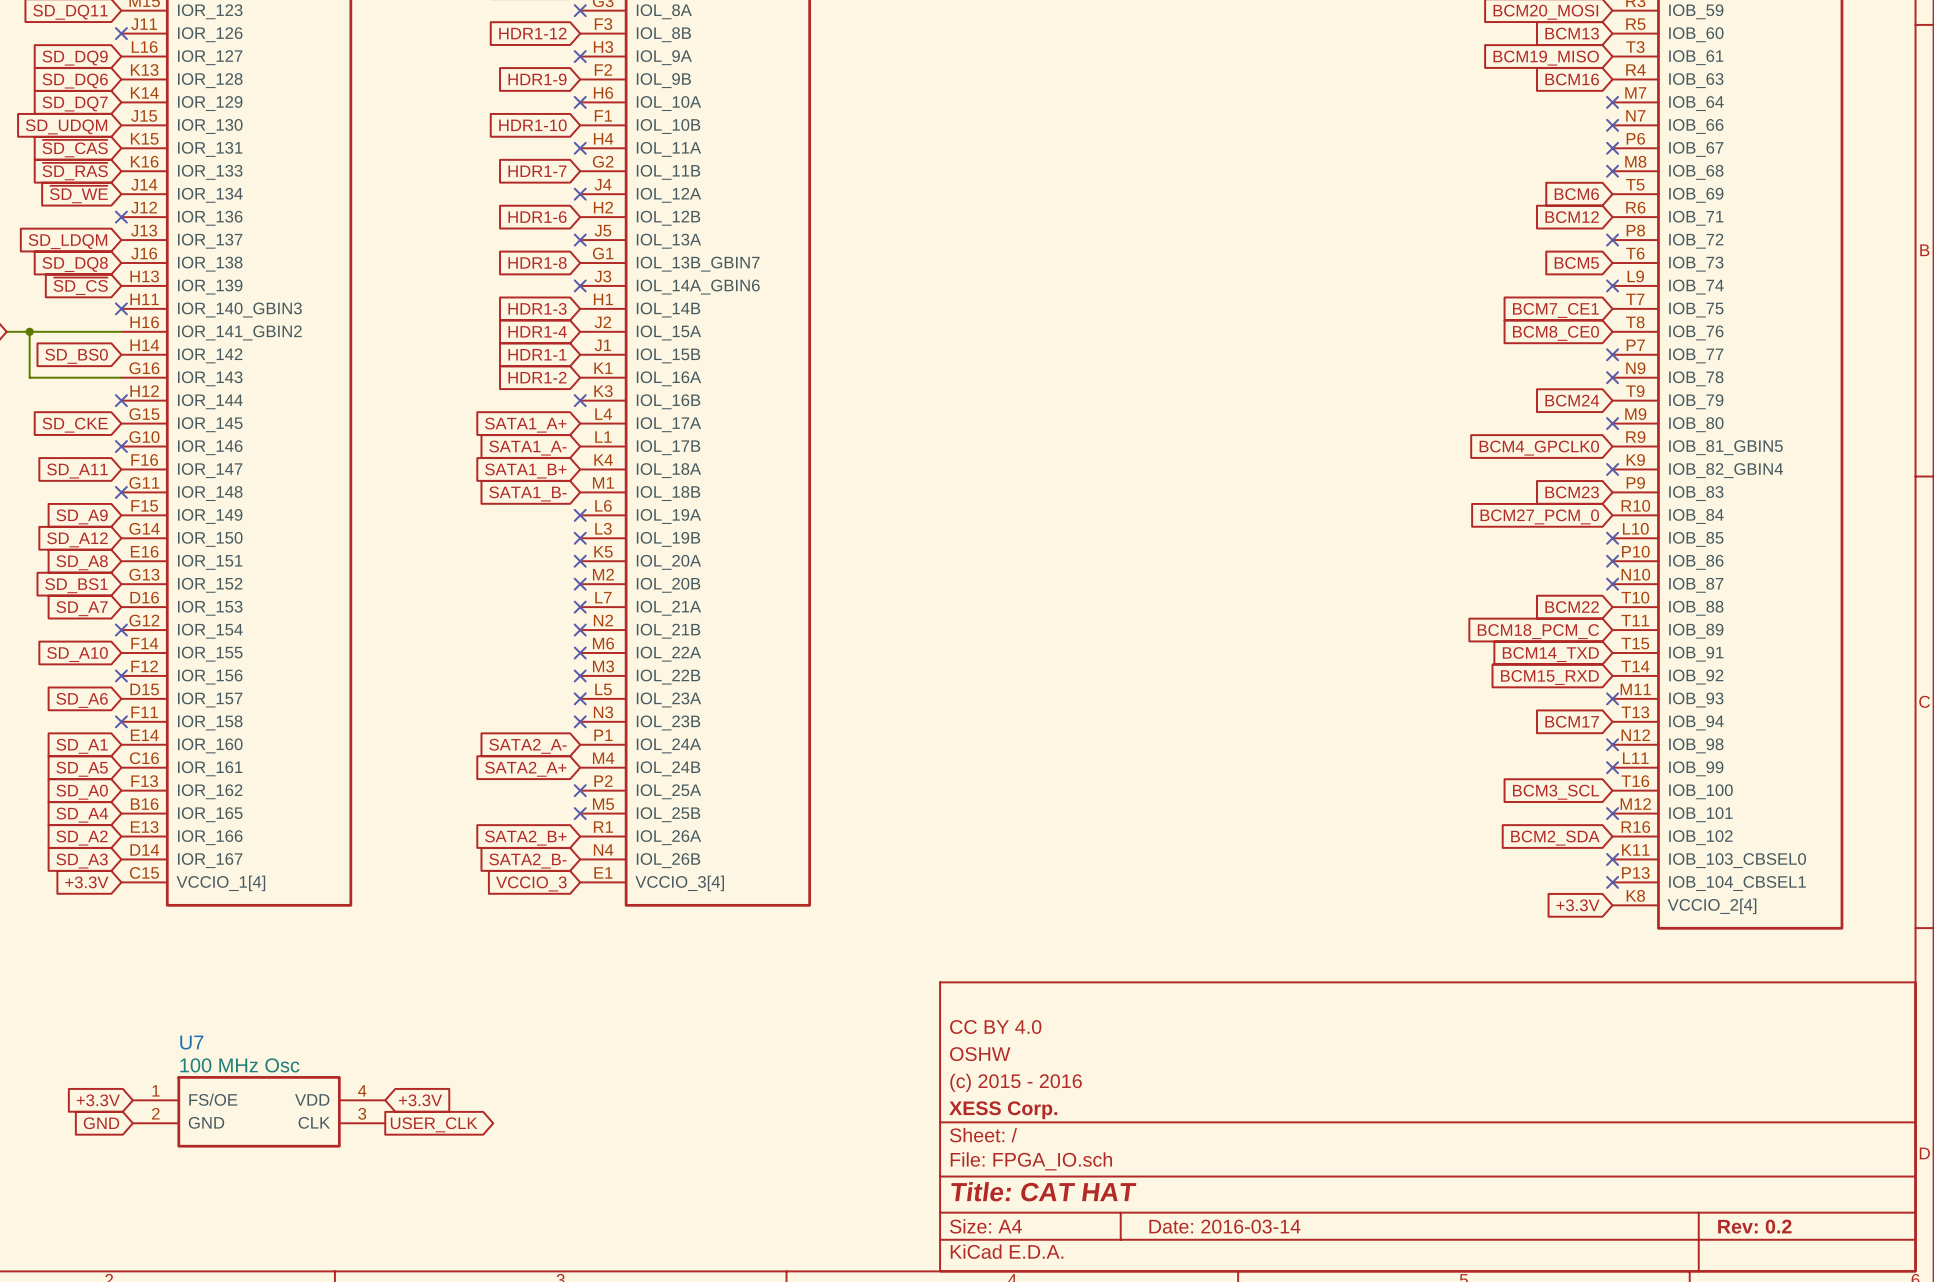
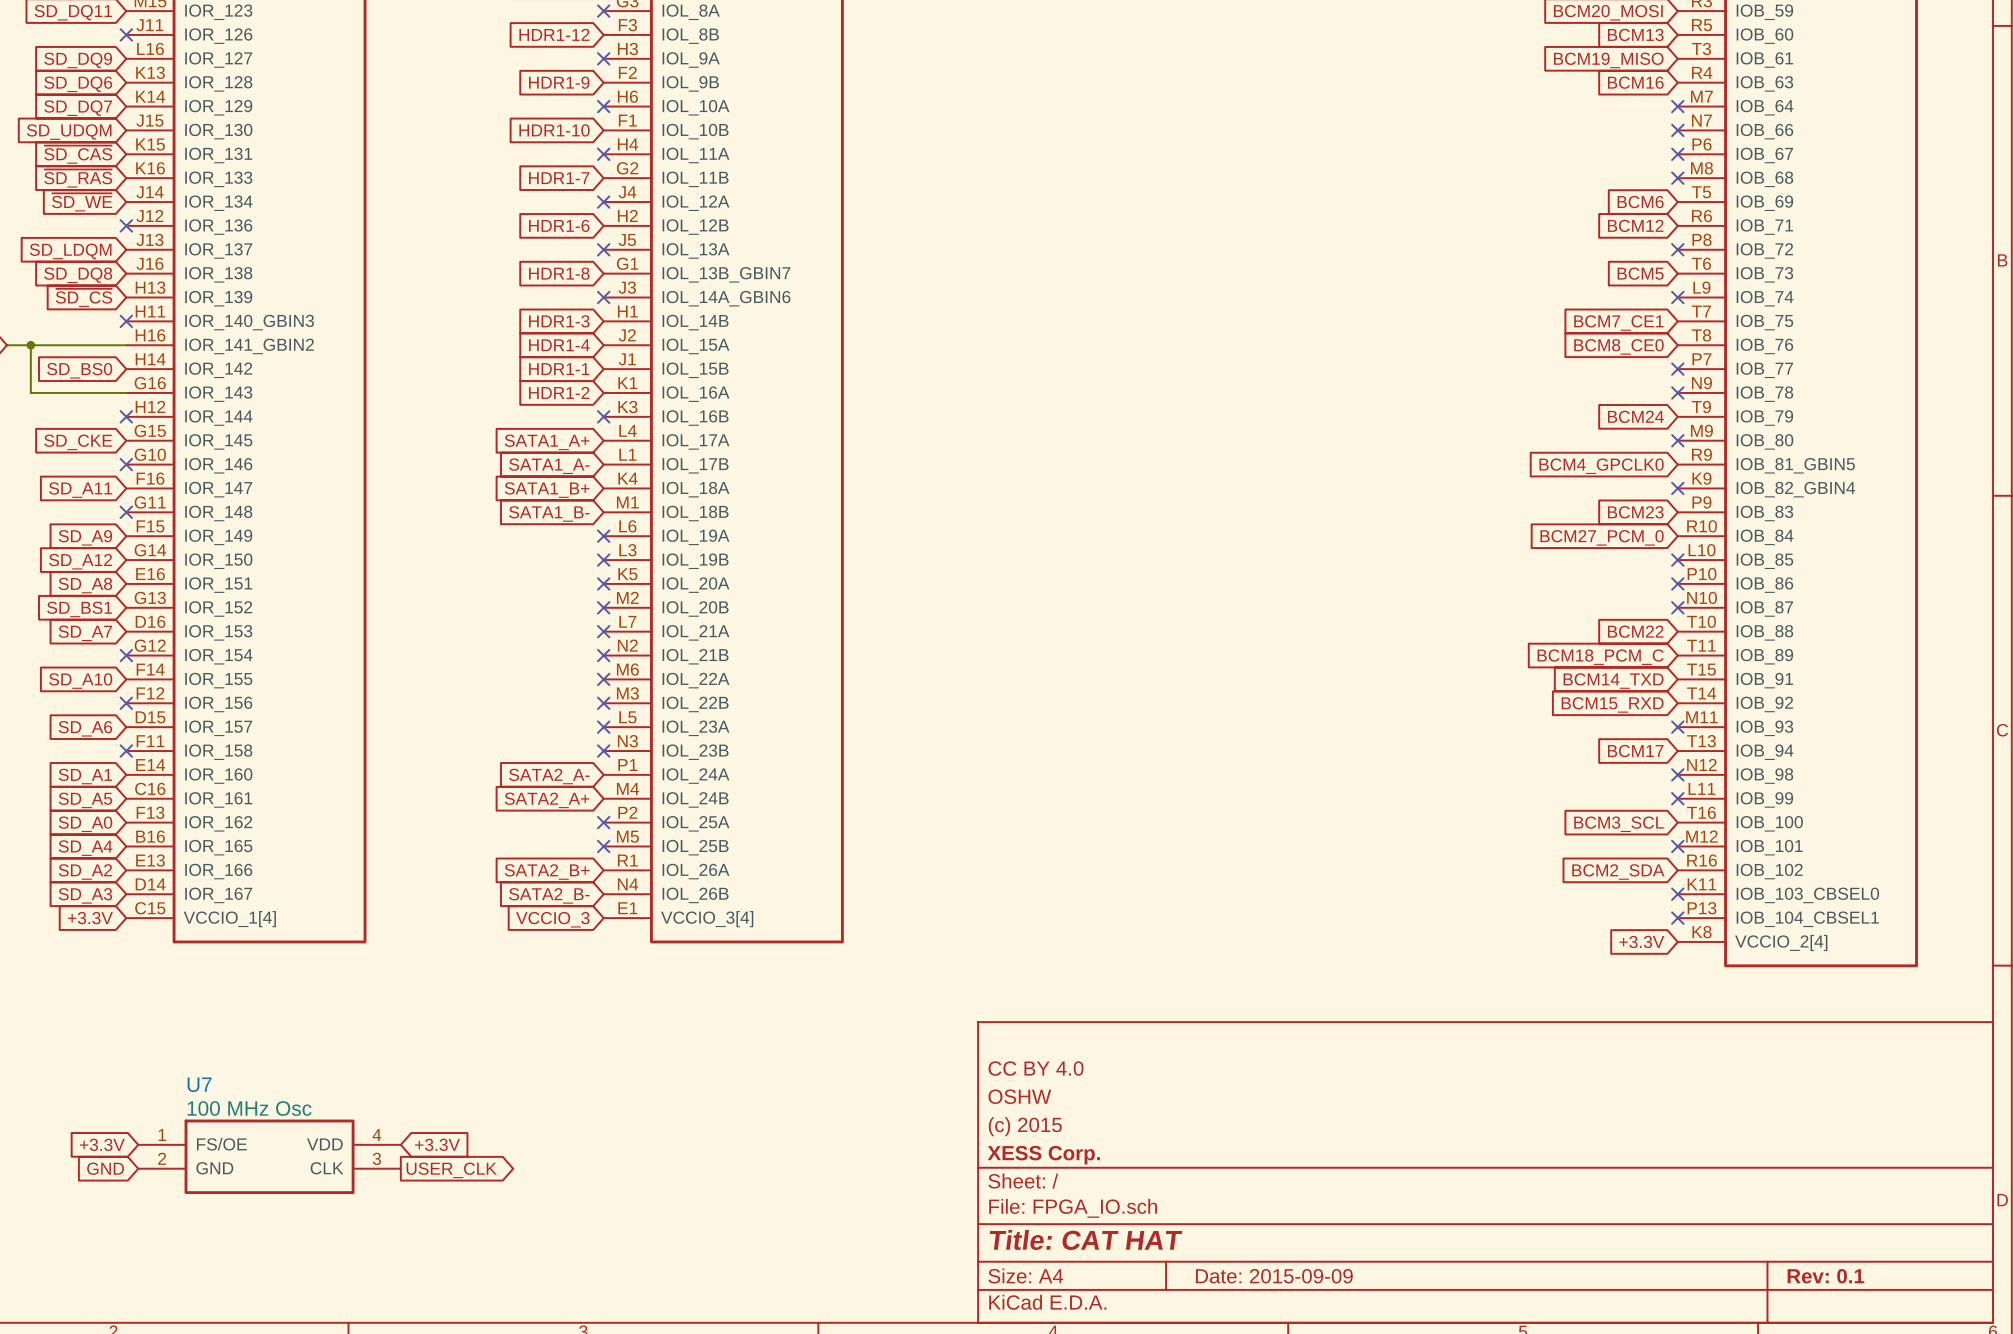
title block: (c) 2015 - 2016 (1016, 1082) -> (c) 2015 (1025, 1126)
title block: Date: 2016-03-14 (1224, 1226) -> Date: 2015-09-09 (1274, 1276)
title block: Rev: 0.2 (1754, 1226) -> Rev: 0.1 (1825, 1276)

